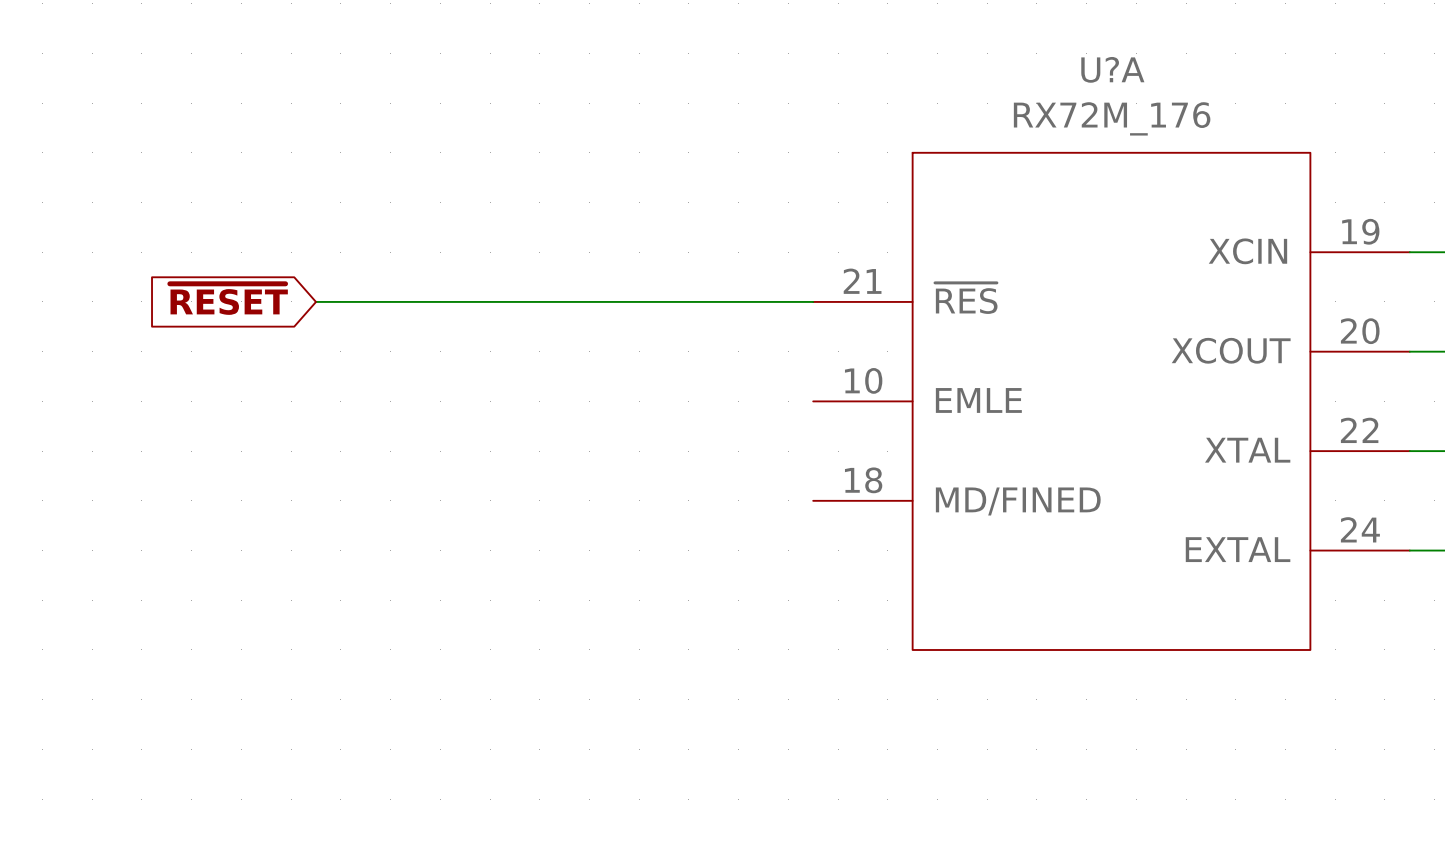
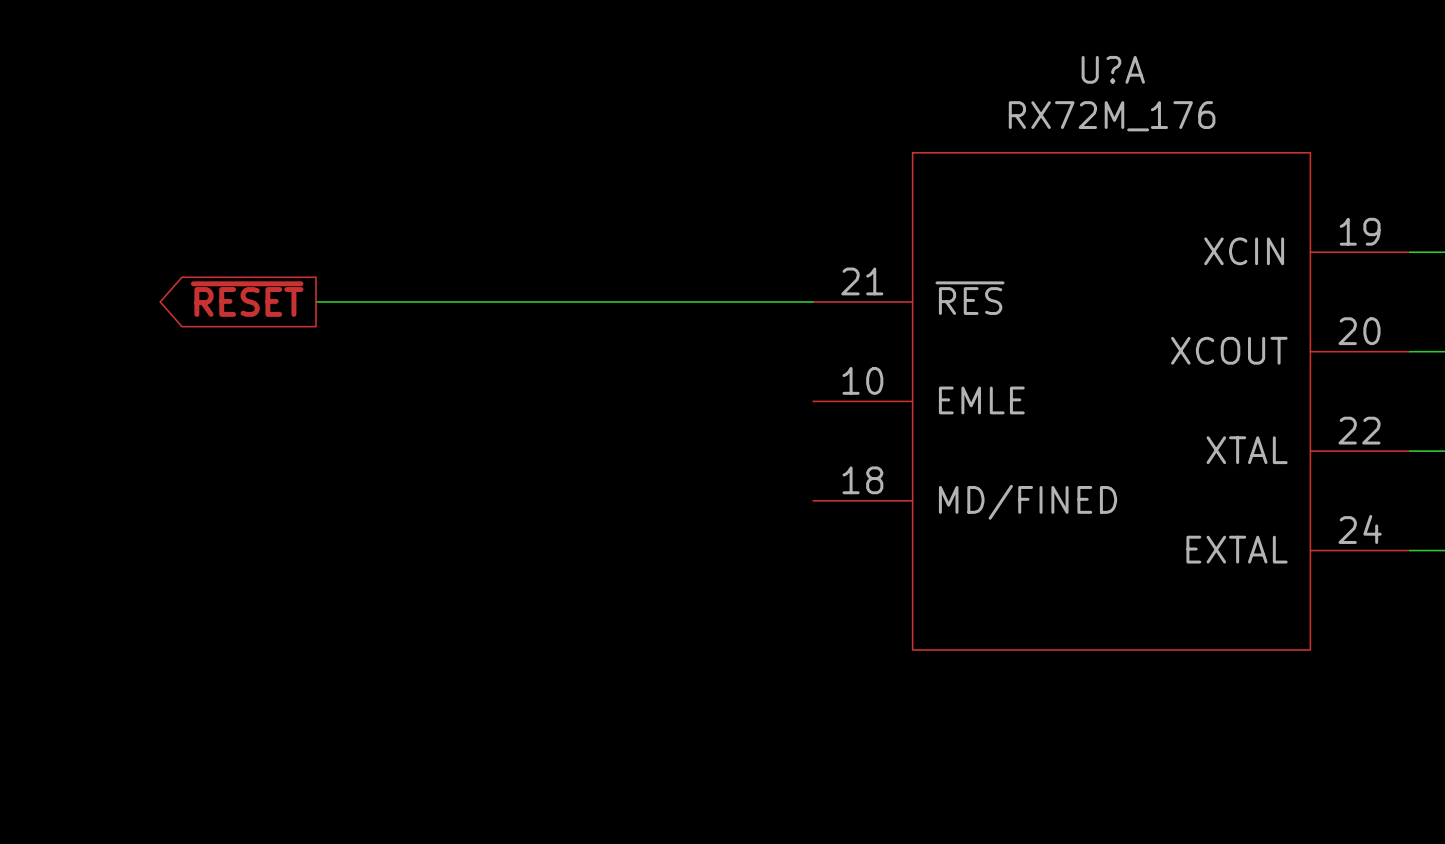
global label shape: input (228, 299) -> output (247, 299)

